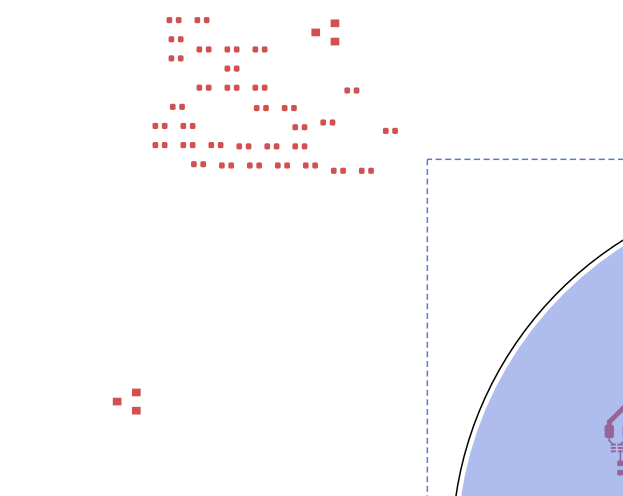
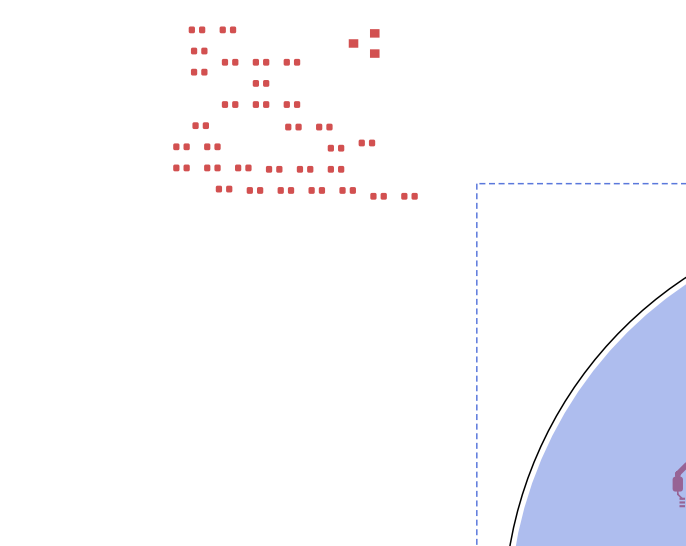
part: (351, 90) -> none
part: (390, 130) -> none
part: (126, 401) -> none

